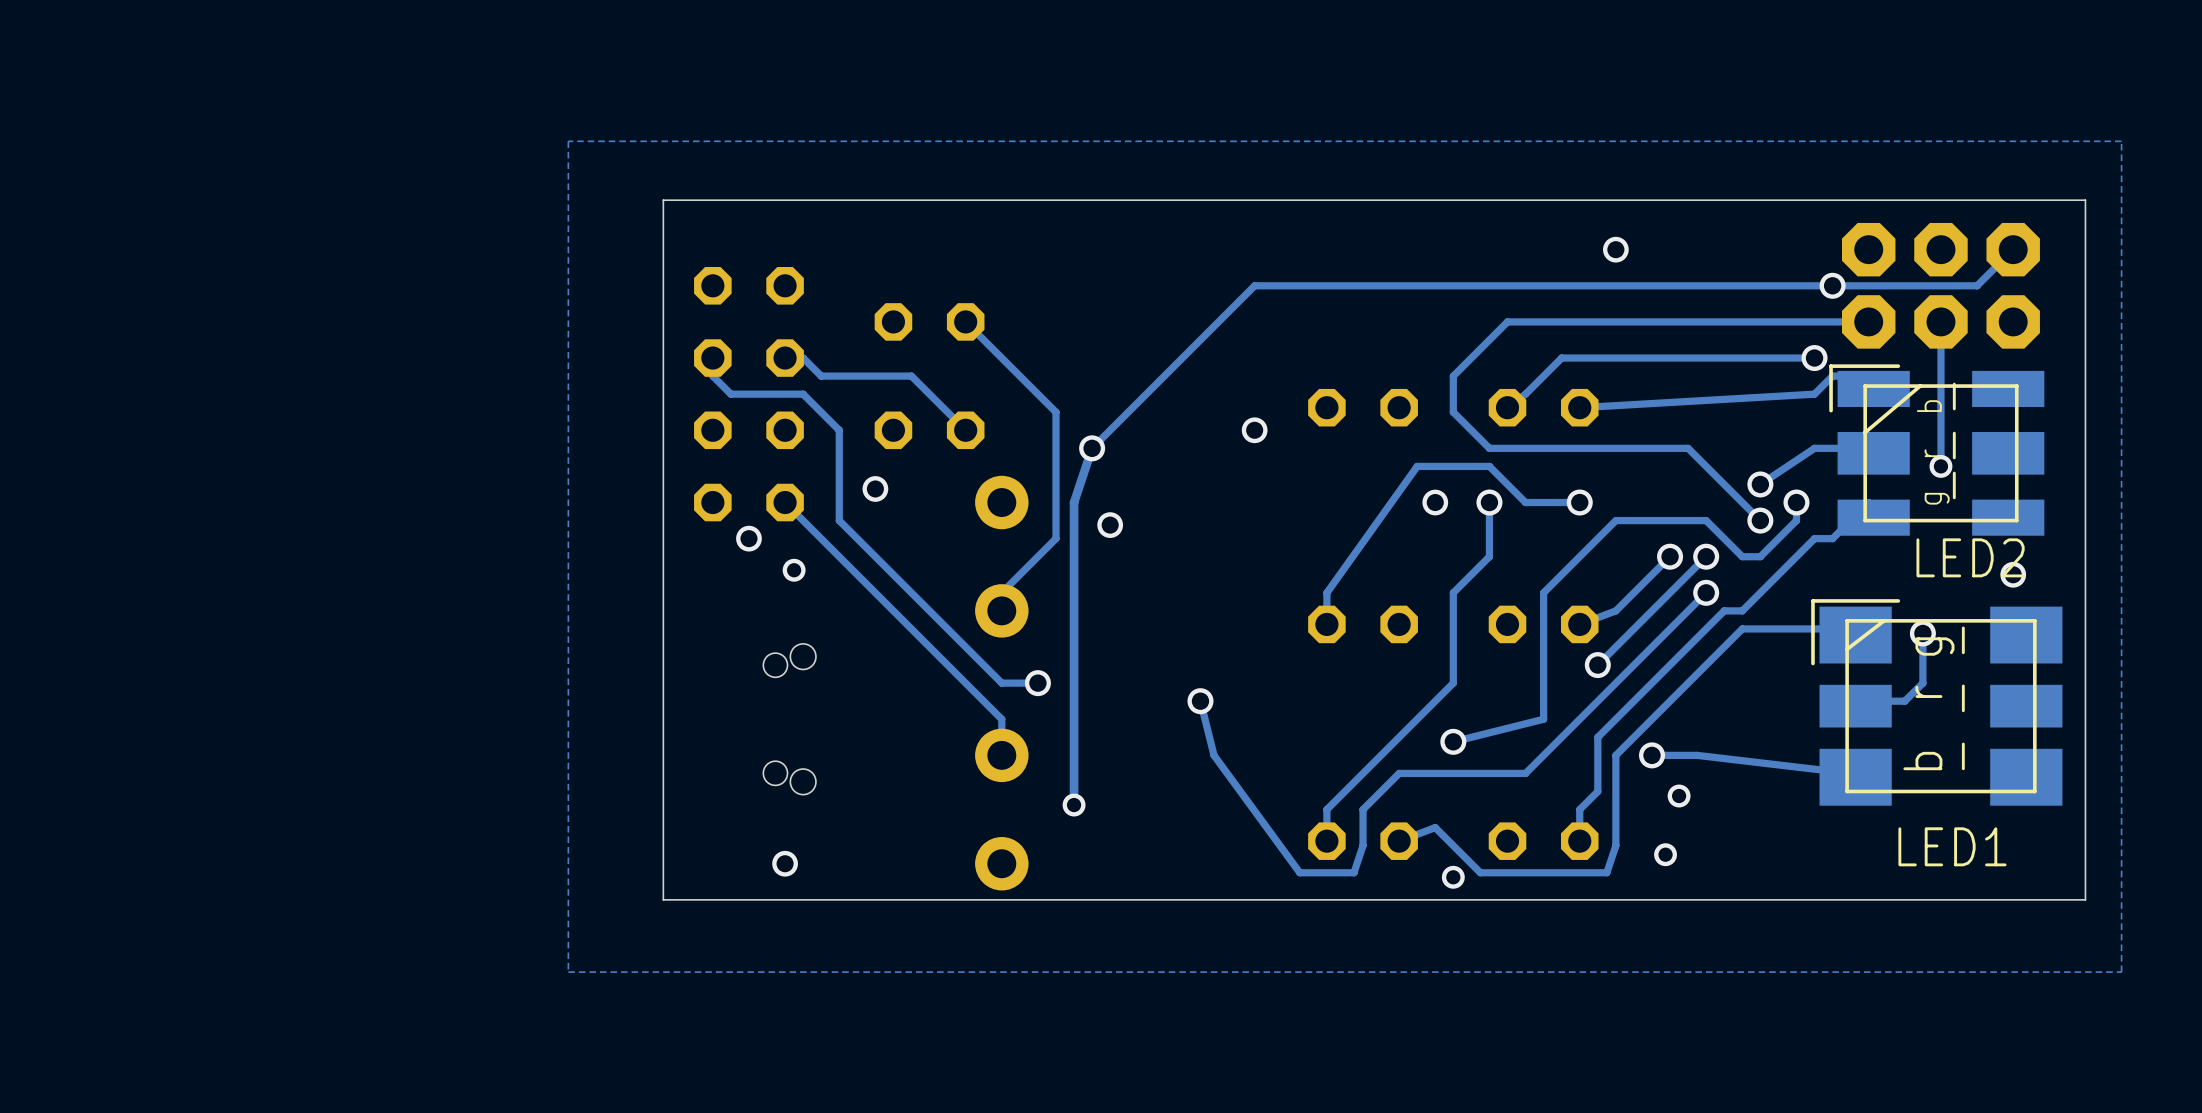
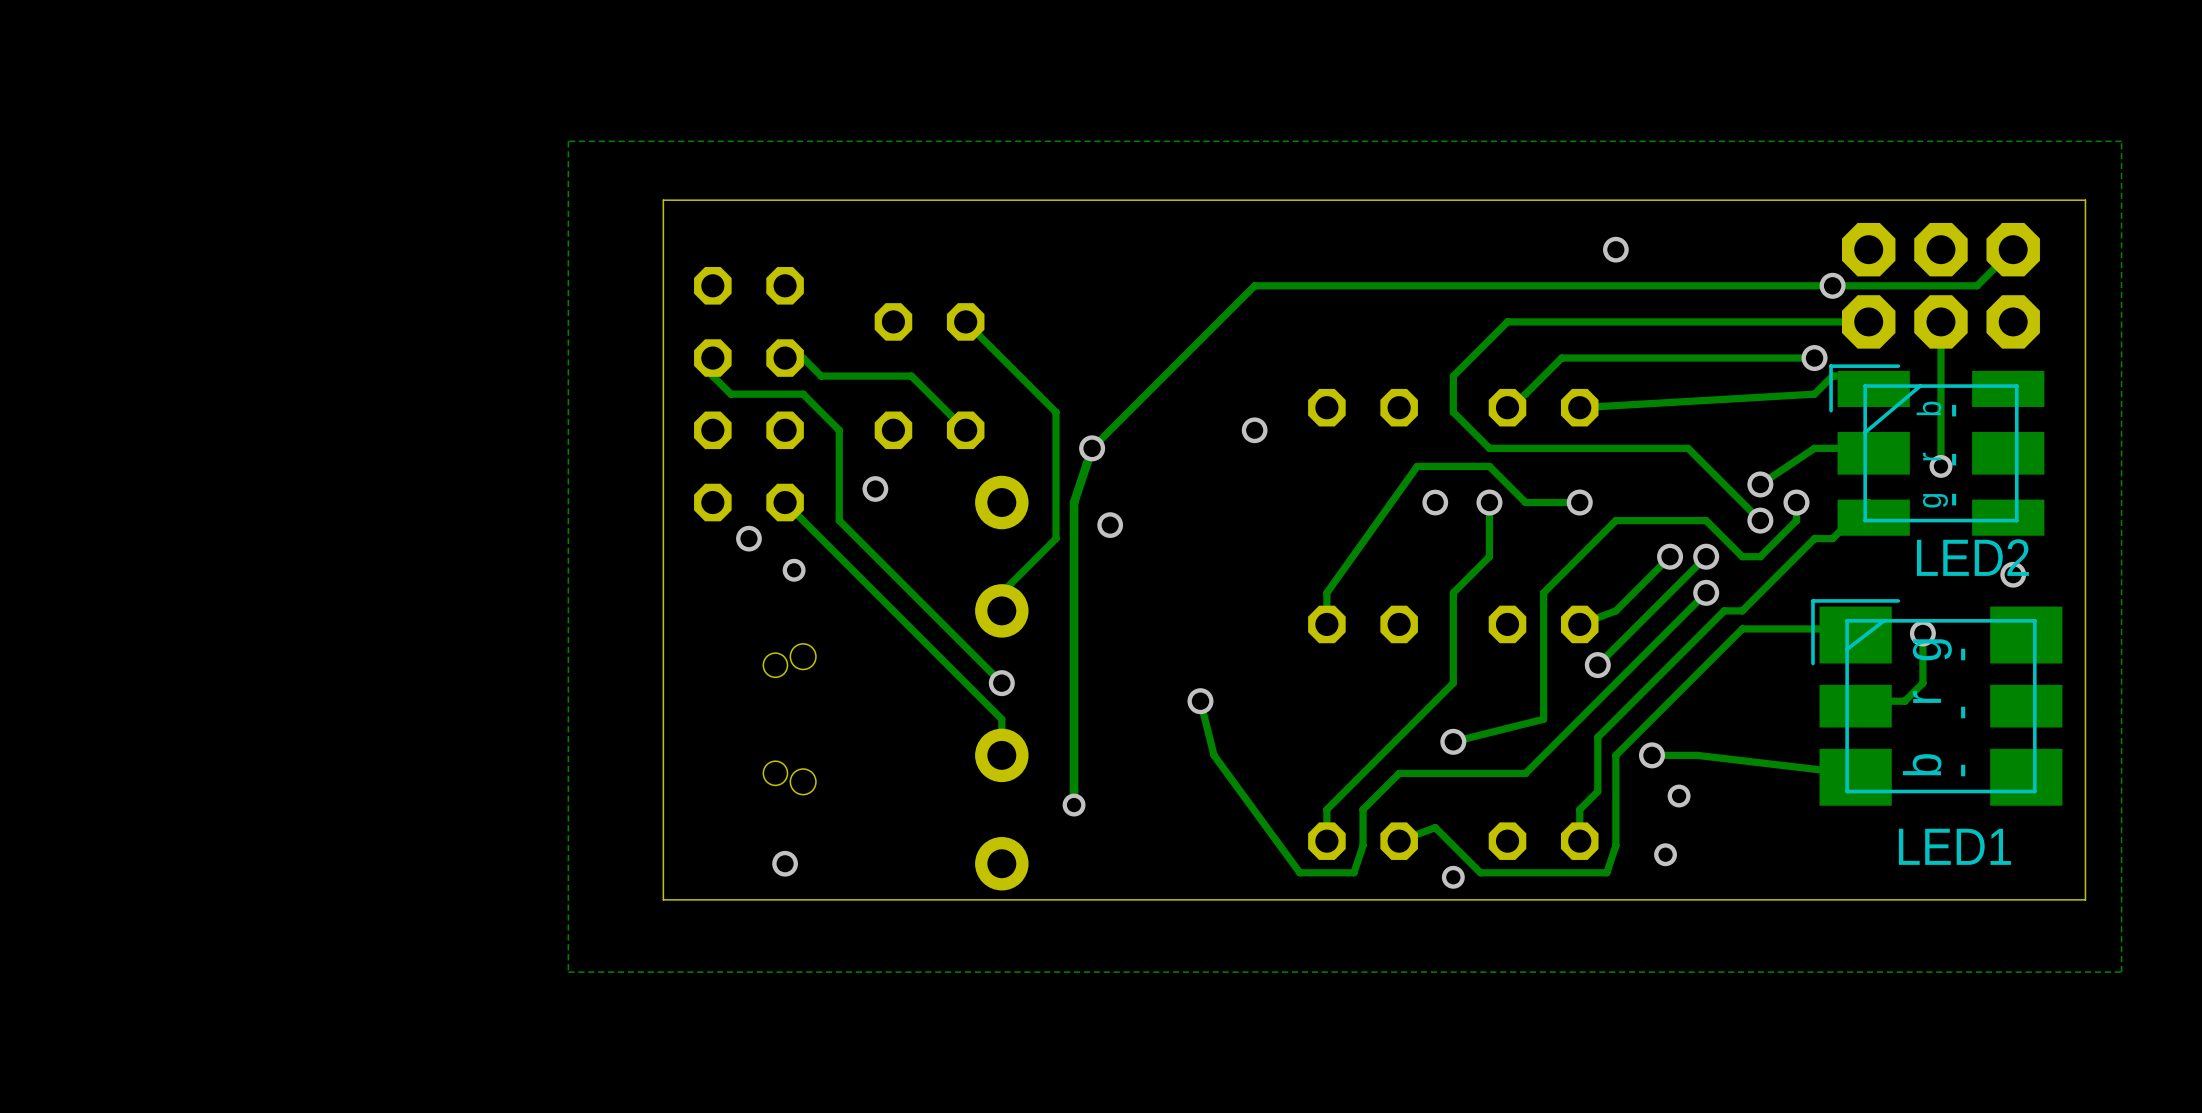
track: (1037, 683) (1001, 683) -> none
via position: (1037, 683) -> (1001, 683)

